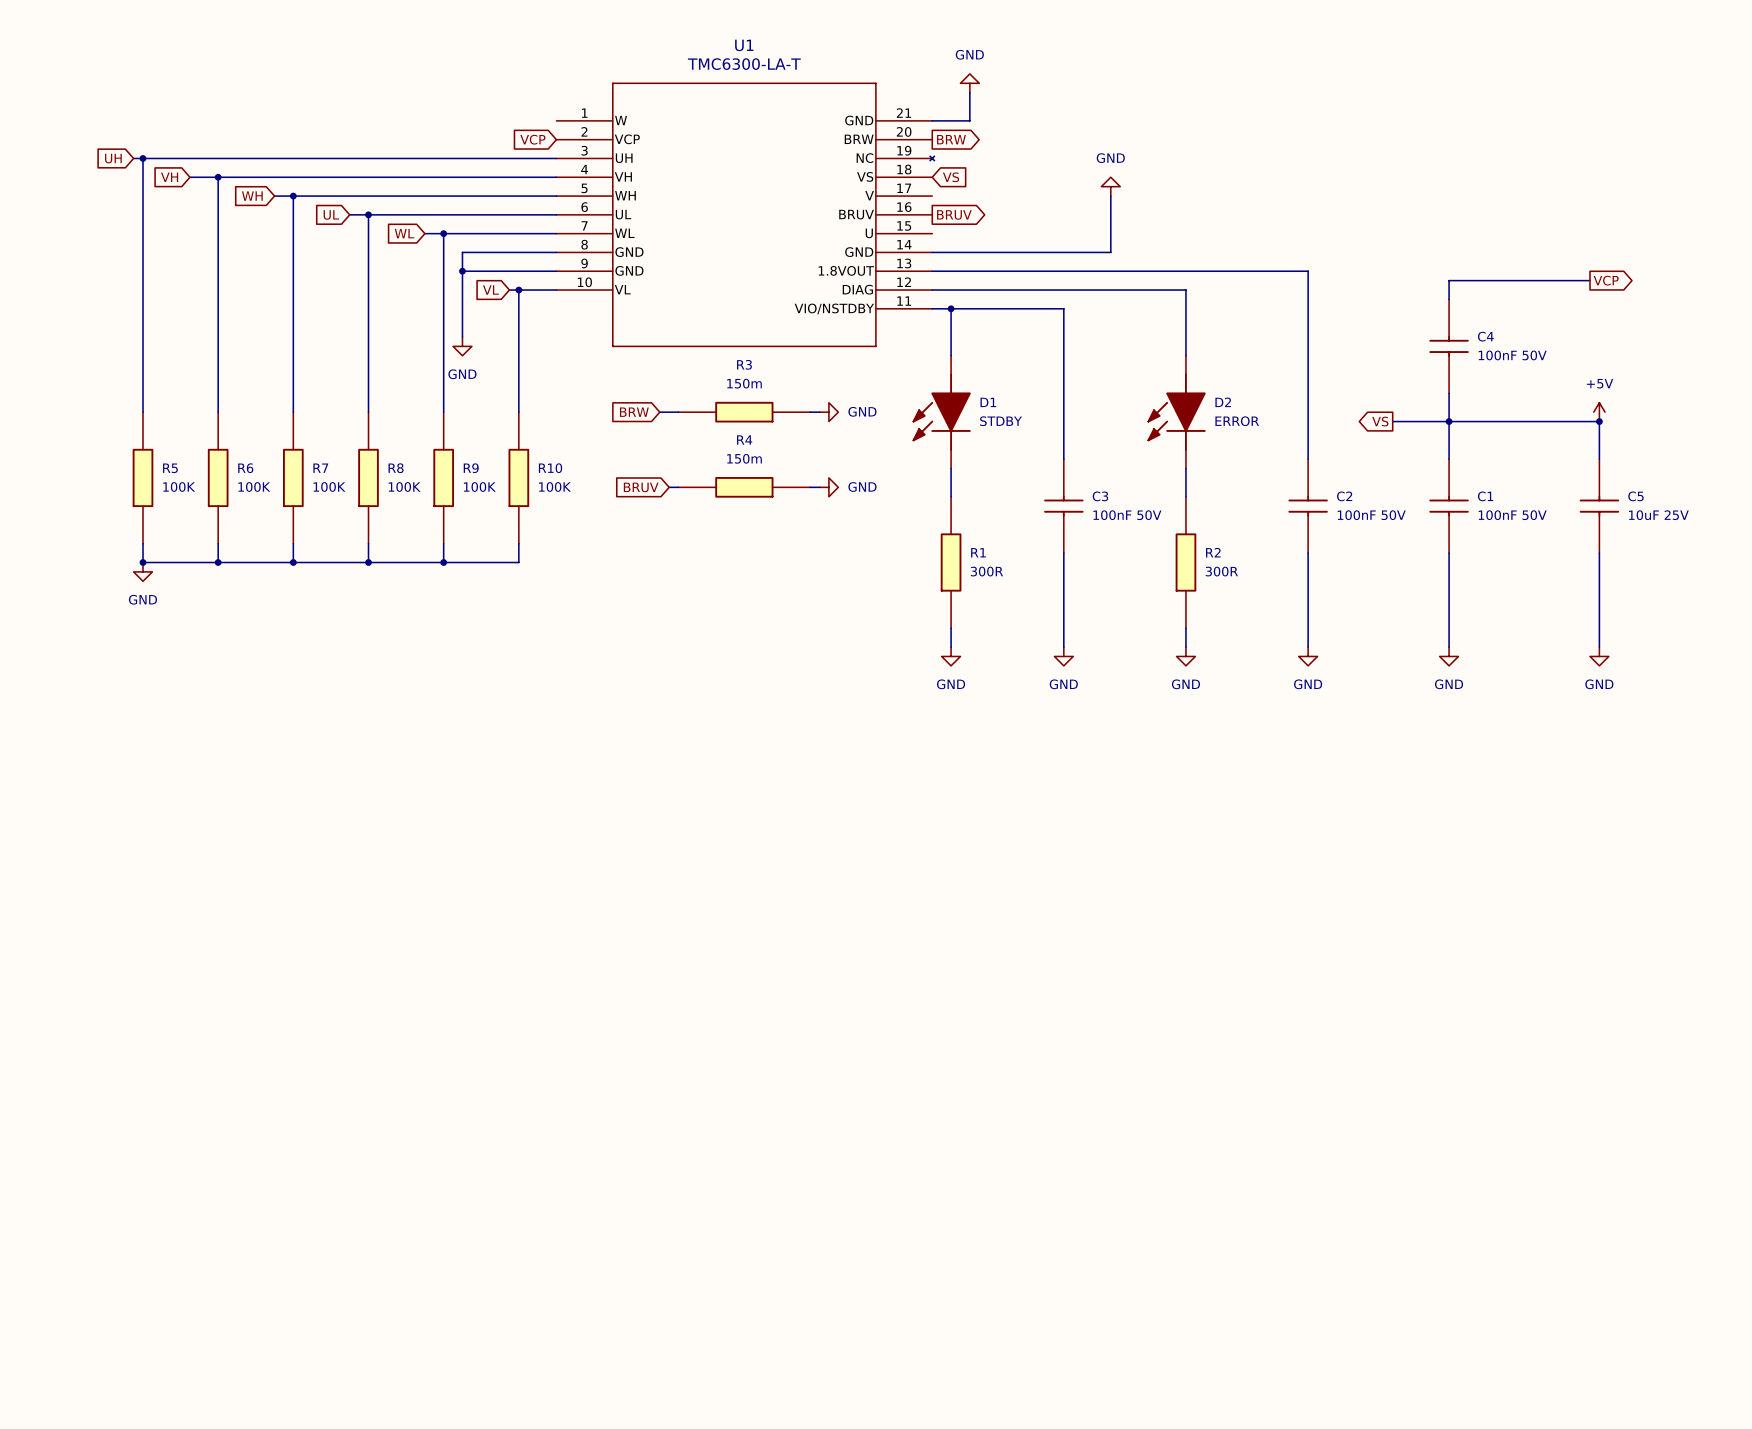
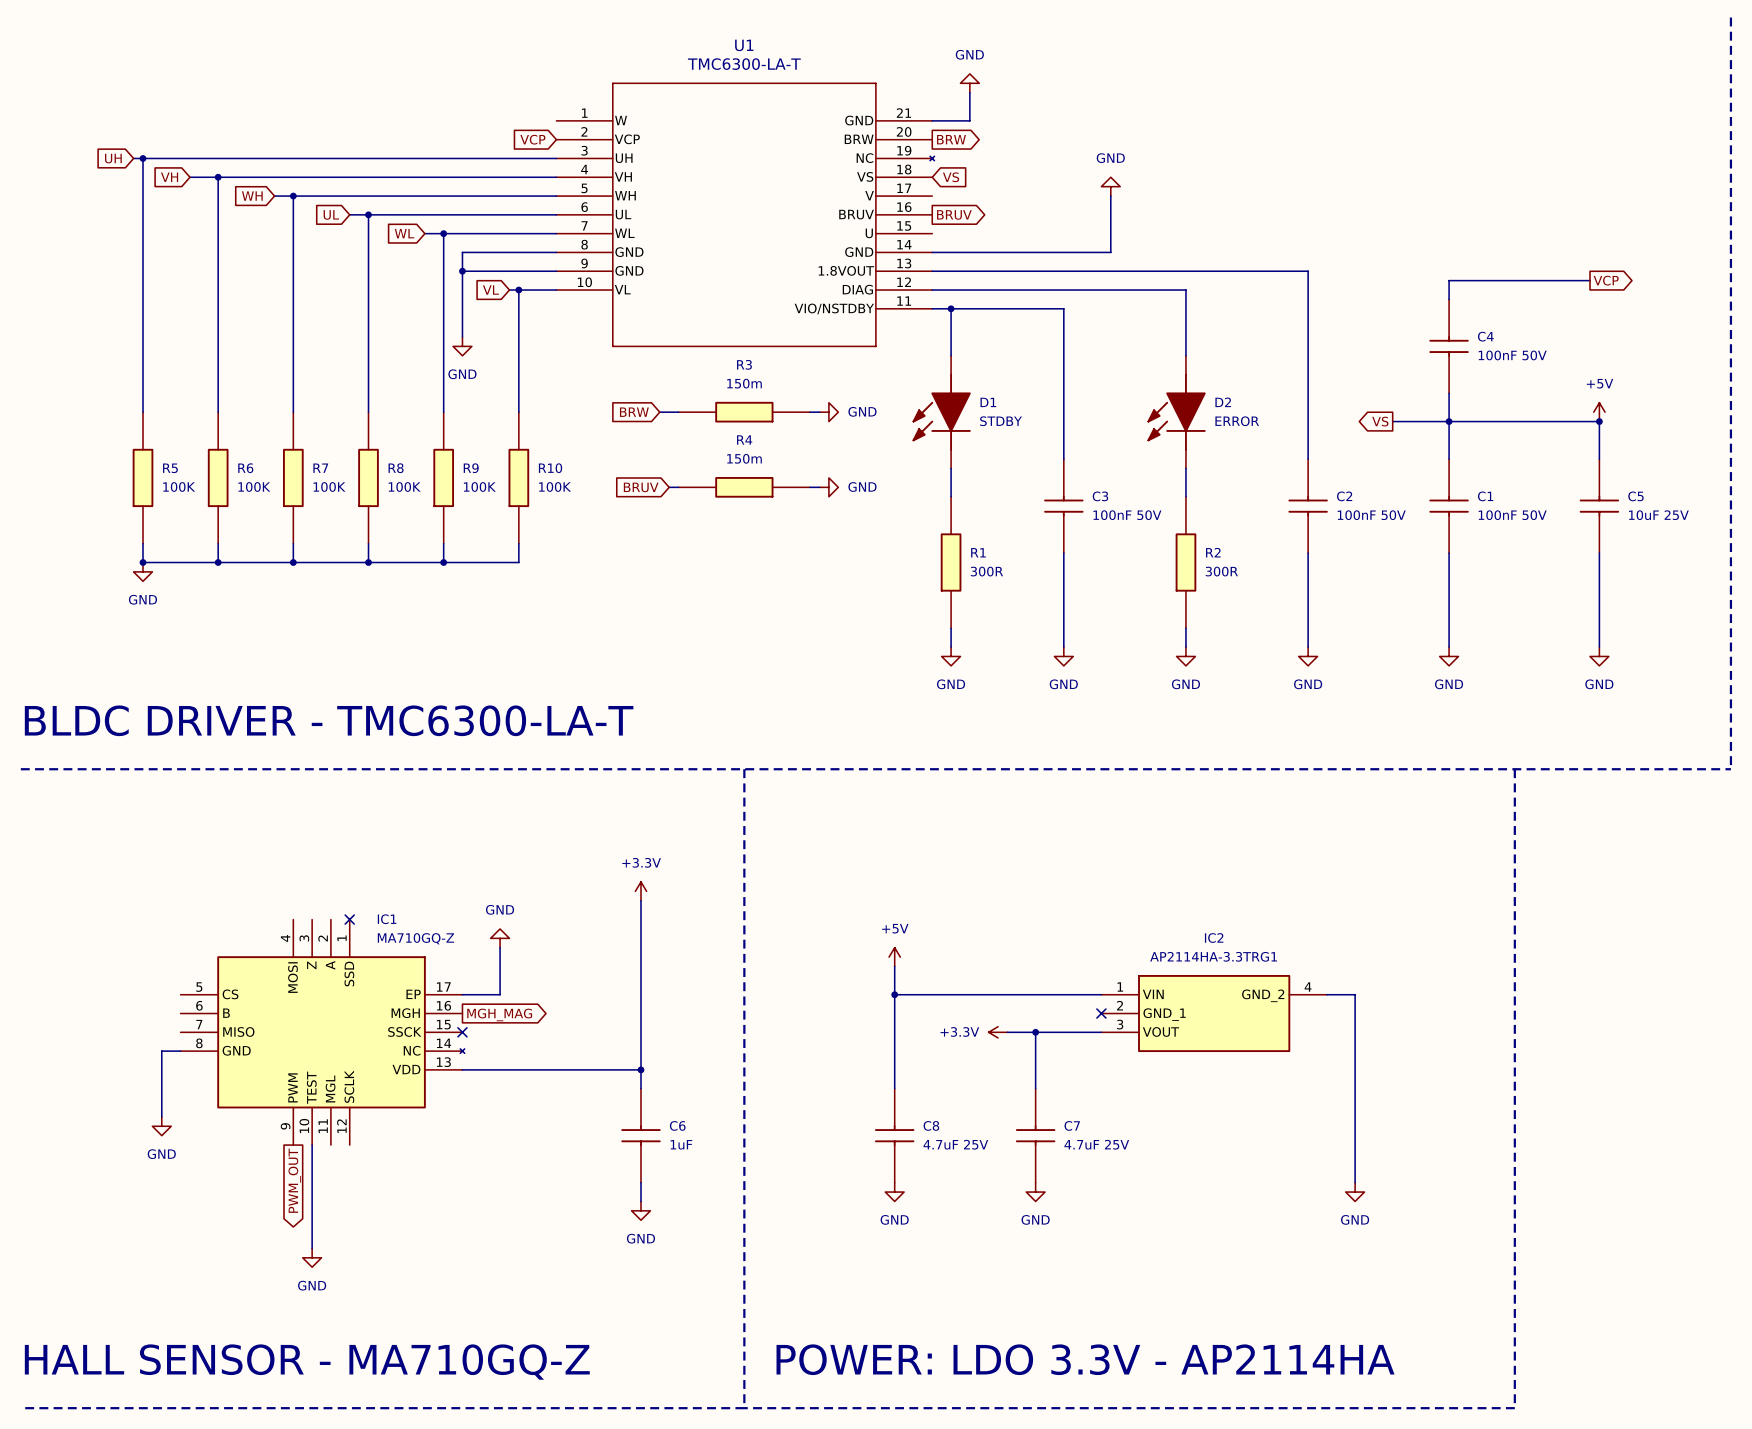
line: none -> (1730, 17) (1730, 769) (20, 769)
text: none -> BLDC DRIVER - TMC6300-LA-T (329, 720)
line: none -> (744, 769) (744, 1408)
line: none -> (1514, 769) (1514, 1408) (20, 1408)
power symbol: none -> +3.3V (640, 891)
wire: none -> (640, 900) (640, 1088)
no-connect mark: none -> (349, 919)
power symbol: none -> GND (500, 938)
wire: none -> (500, 947) (500, 994) (462, 994)
power symbol: none -> +5V (894, 957)
wire: none -> (894, 966) (894, 1088)
wire: none -> (894, 994) (1101, 994)
junction: none -> (894, 994)
wire: none -> (1326, 994) (1355, 994) (1355, 1182)
no-connect mark: none -> (1101, 1013)
IC2: none -> AP2114HA-3.3TRG1 (1214, 1013)
global label: none -> MGH_MAG (499, 1014)
IC1: none -> MA710GQ-Z (322, 1032)
no-connect mark: none -> (462, 1032)
power symbol: none -> +3.3V (998, 1032)
wire: none -> (1007, 1032) (1101, 1032)
wire: none -> (1035, 1032) (1035, 1088)
junction: none -> (1035, 1032)
wire: none -> (180, 1051) (161, 1051) (161, 1116)
wire: none -> (462, 1069) (640, 1069)
junction: none -> (640, 1069)
power symbol: none -> GND (161, 1126)
C6: none -> 1uF (640, 1135)
C8: none -> 4.7uF 25V (894, 1135)
C7: none -> 4.7uF 25V (1035, 1135)
wire: none -> (312, 1145) (312, 1248)
global label: none -> PWM_OUT (294, 1180)
wire: none -> (640, 1182) (640, 1201)
power symbol: none -> GND (894, 1192)
power symbol: none -> GND (1035, 1192)
power symbol: none -> GND (1355, 1192)
power symbol: none -> GND (640, 1210)
power symbol: none -> GND (312, 1257)
text: none -> POWER: LDO 3.3V - AP2114HA (1085, 1359)
text: none -> HALL SENSOR - MA710GQ-Z (307, 1362)

